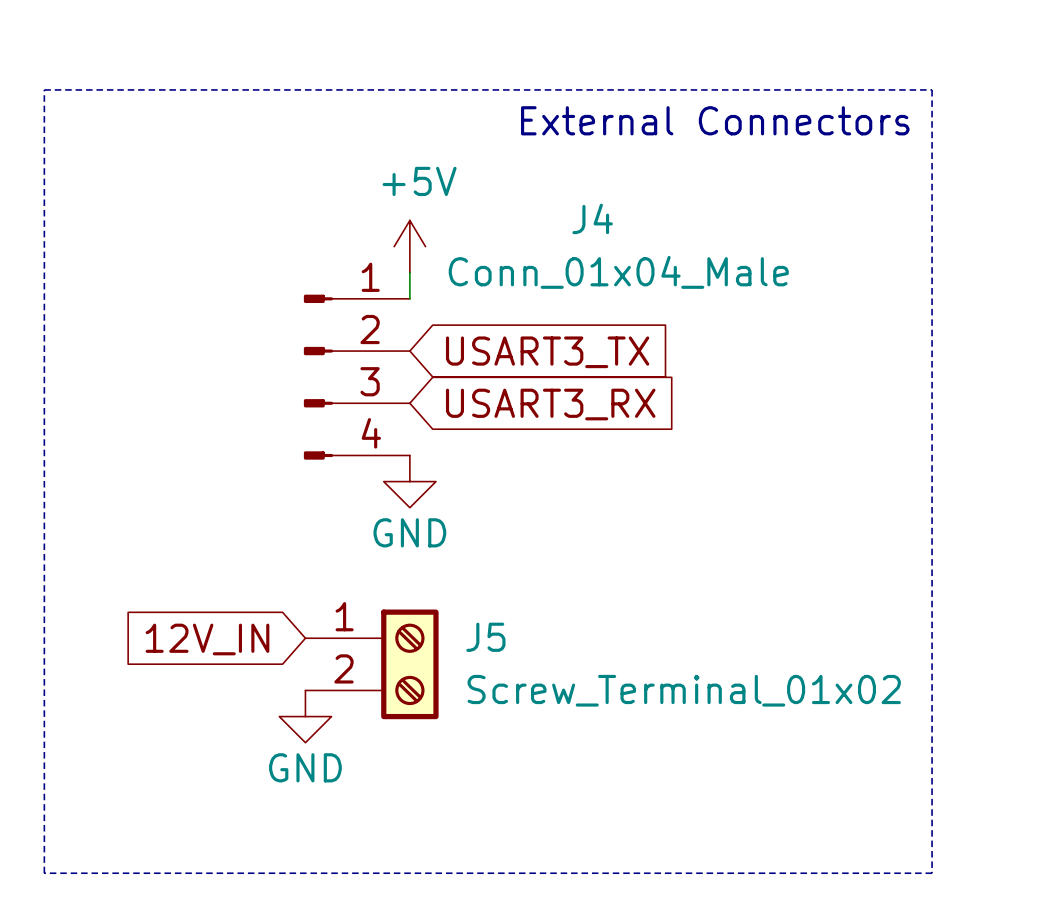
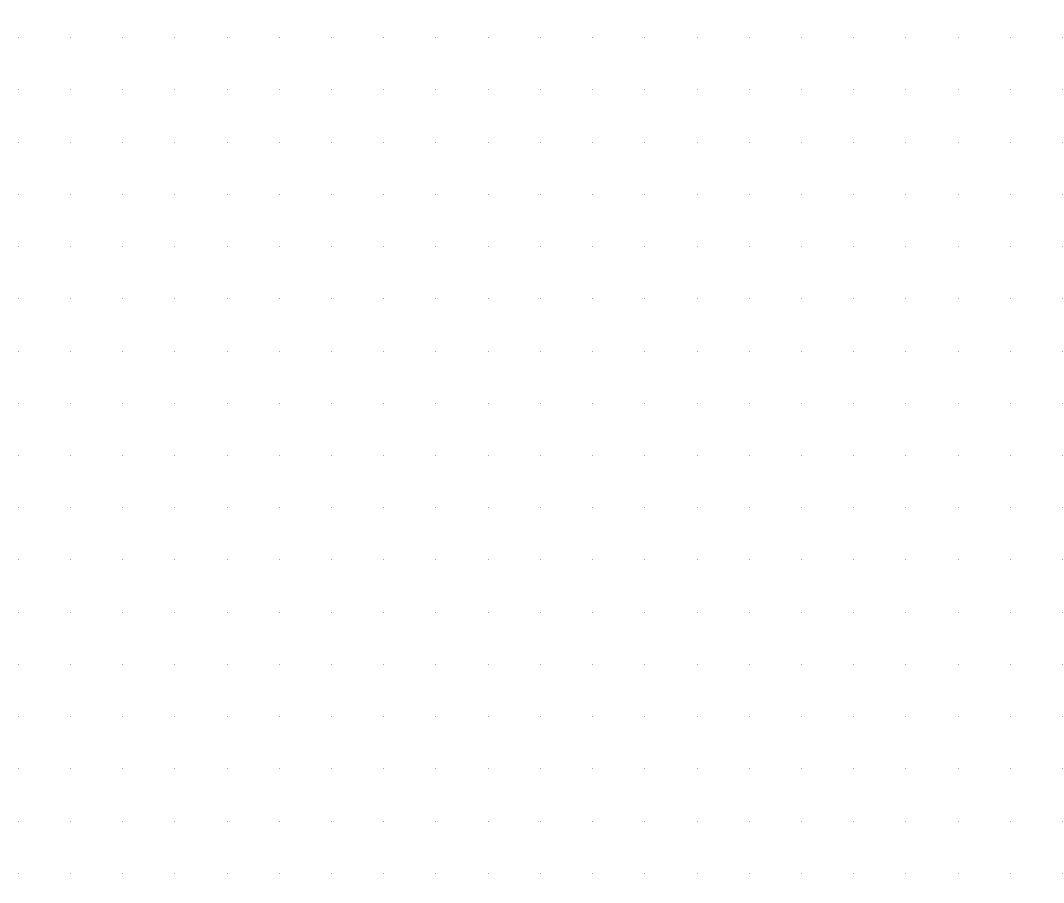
line: (44, 89) (44, 873) (932, 873) (932, 89) (44, 89) -> none
text: External Connectors (715, 120) -> none
power symbol: +5V (409, 246) -> none
wire: (409, 272) (409, 298) -> none
global label: USART3_TX (547, 352) -> none
J4: Conn_01x04_Male (356, 377) -> none
global label: USART3_RX (550, 404) -> none
power symbol: GND (409, 481) -> none
global label: 12V_IN (207, 639) -> none
J5: Screw_Terminal_01x02 (372, 664) -> none
power symbol: GND (305, 716) -> none

